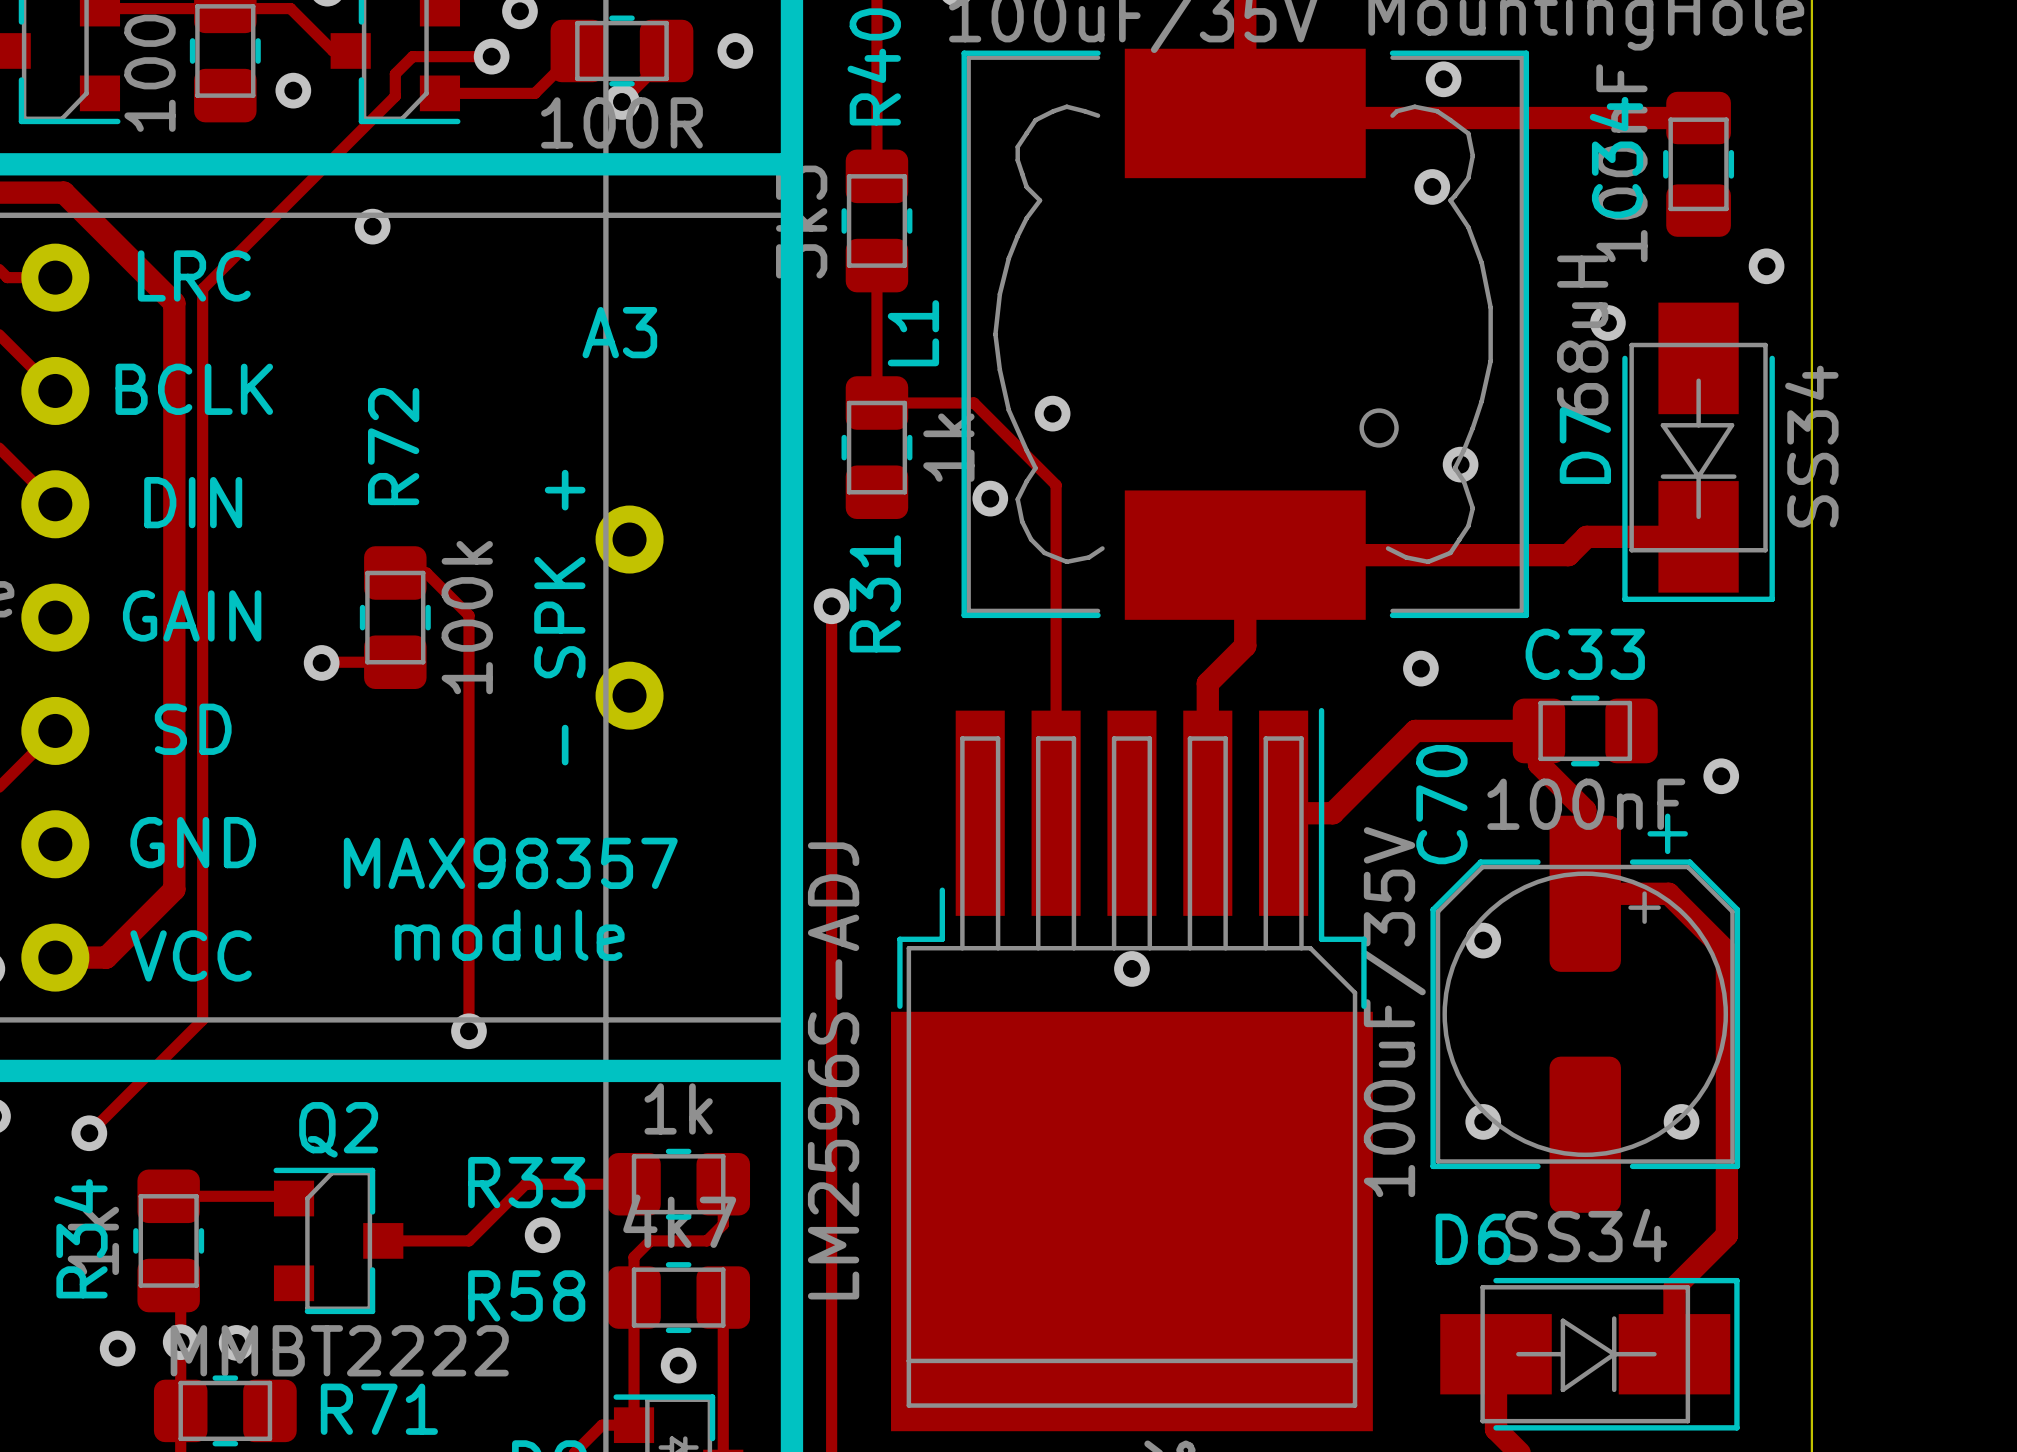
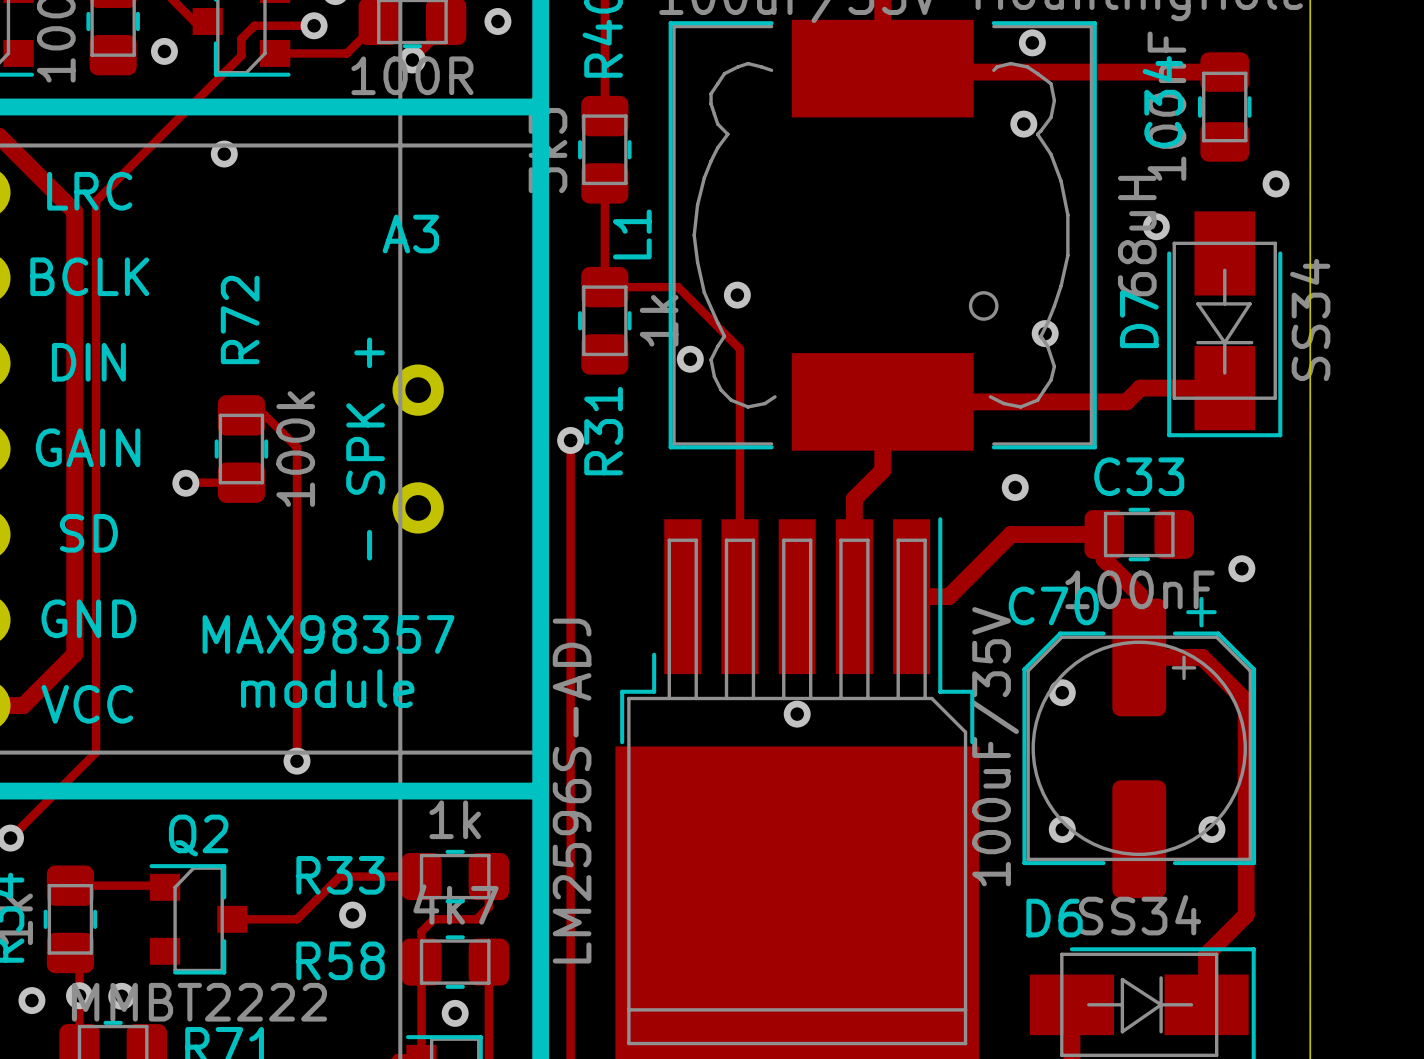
C70 name rotation: 0° (1441, 804) -> 90° clockwise (1053, 605)

